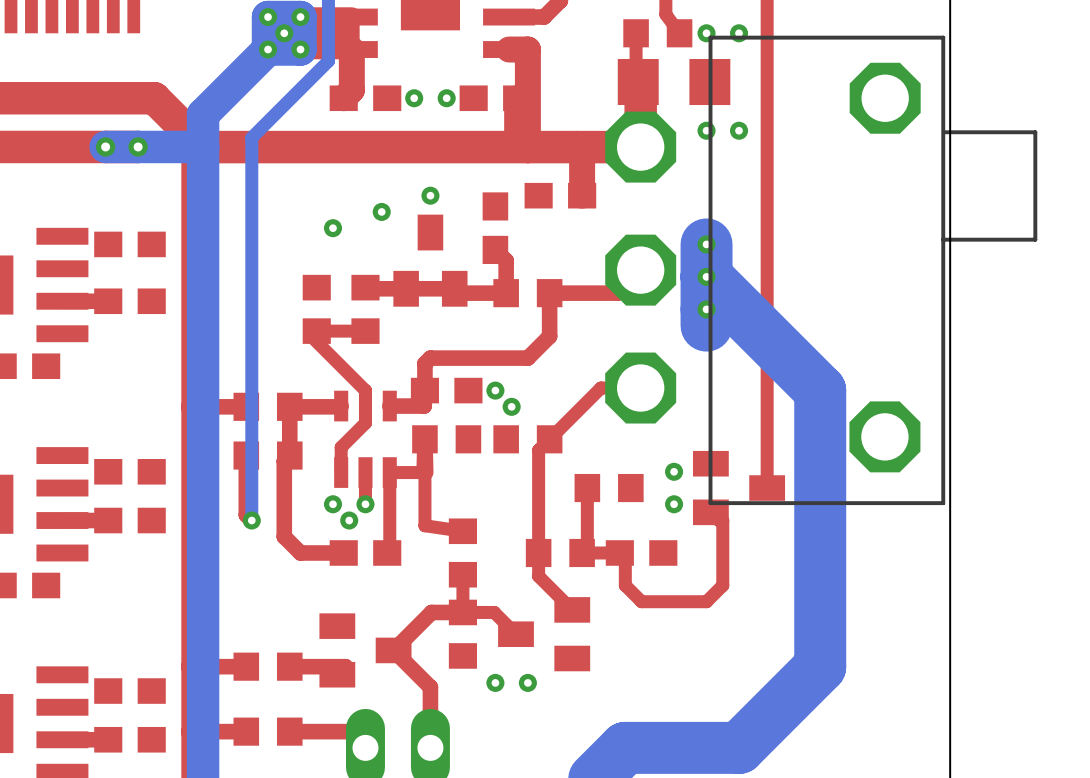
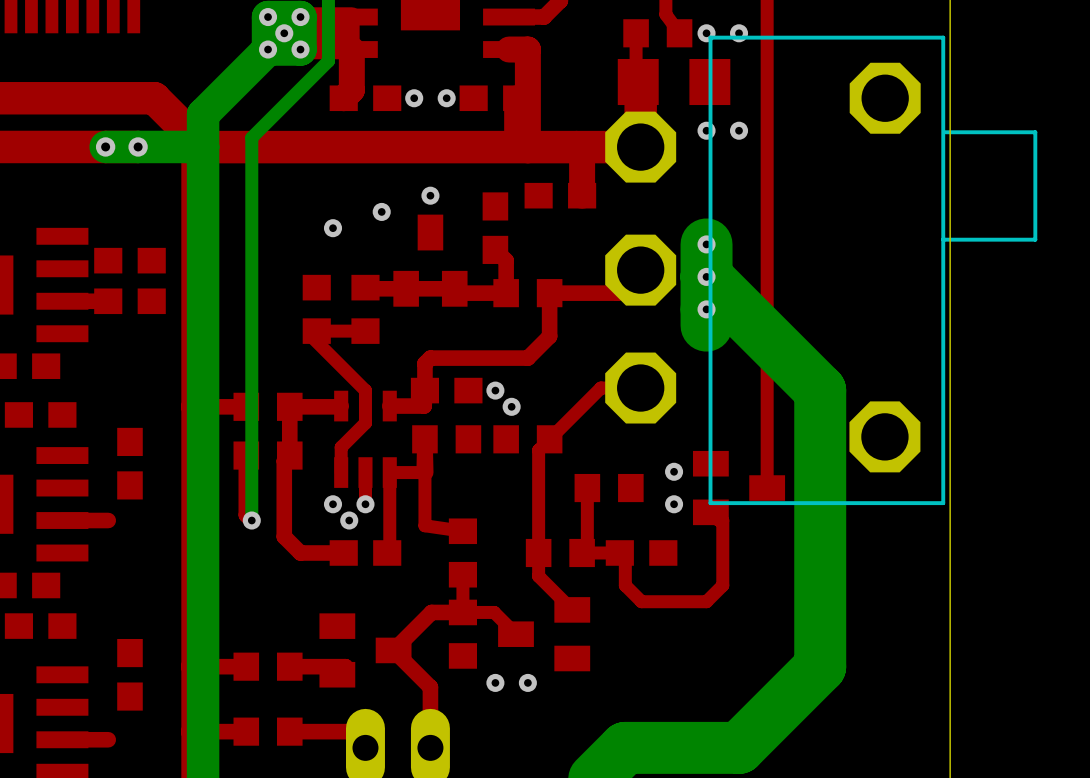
part position: (129, 244) -> (129, 260)
part: none -> (40, 414)
part rotation: 0° (129, 471) -> 90° clockwise (129, 463)
part: (129, 520) -> none
part: none -> (40, 626)
part rotation: 0° (129, 691) -> 90° clockwise (129, 674)
part: (129, 739) -> none

